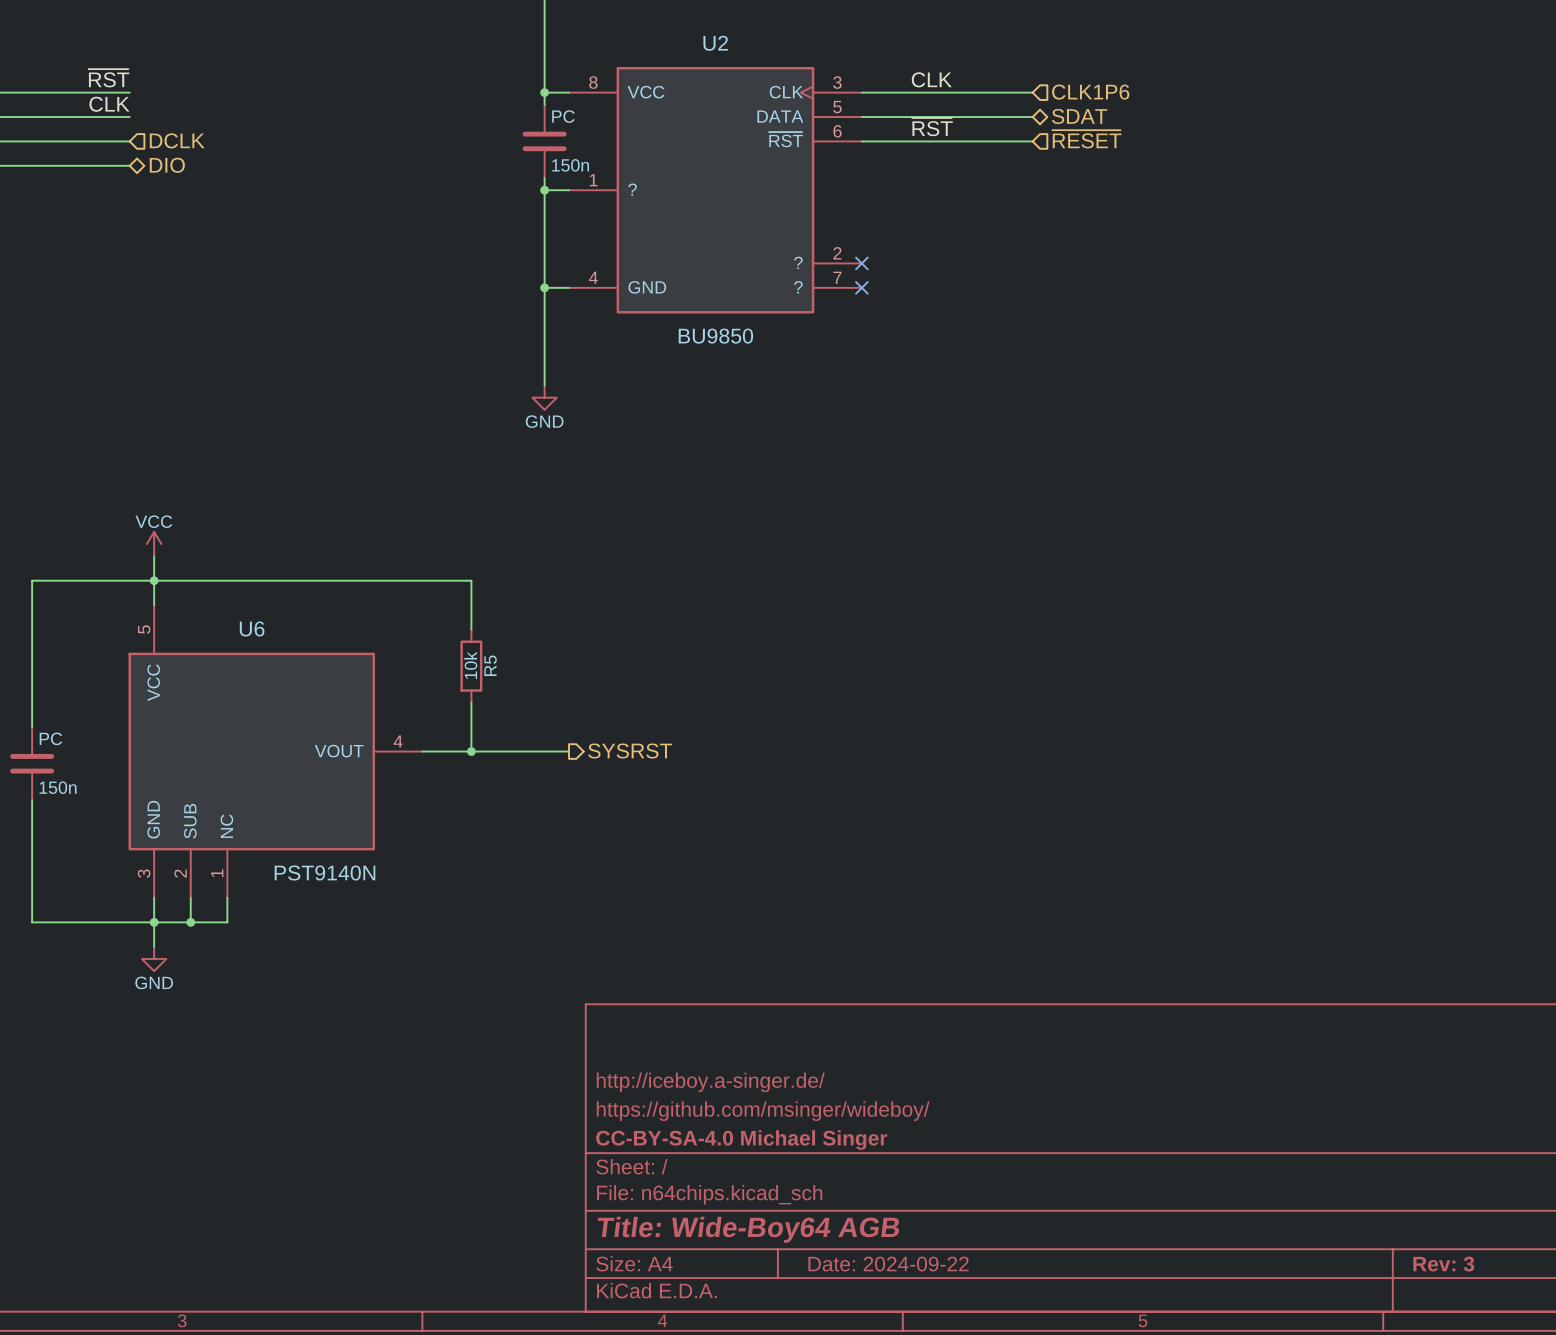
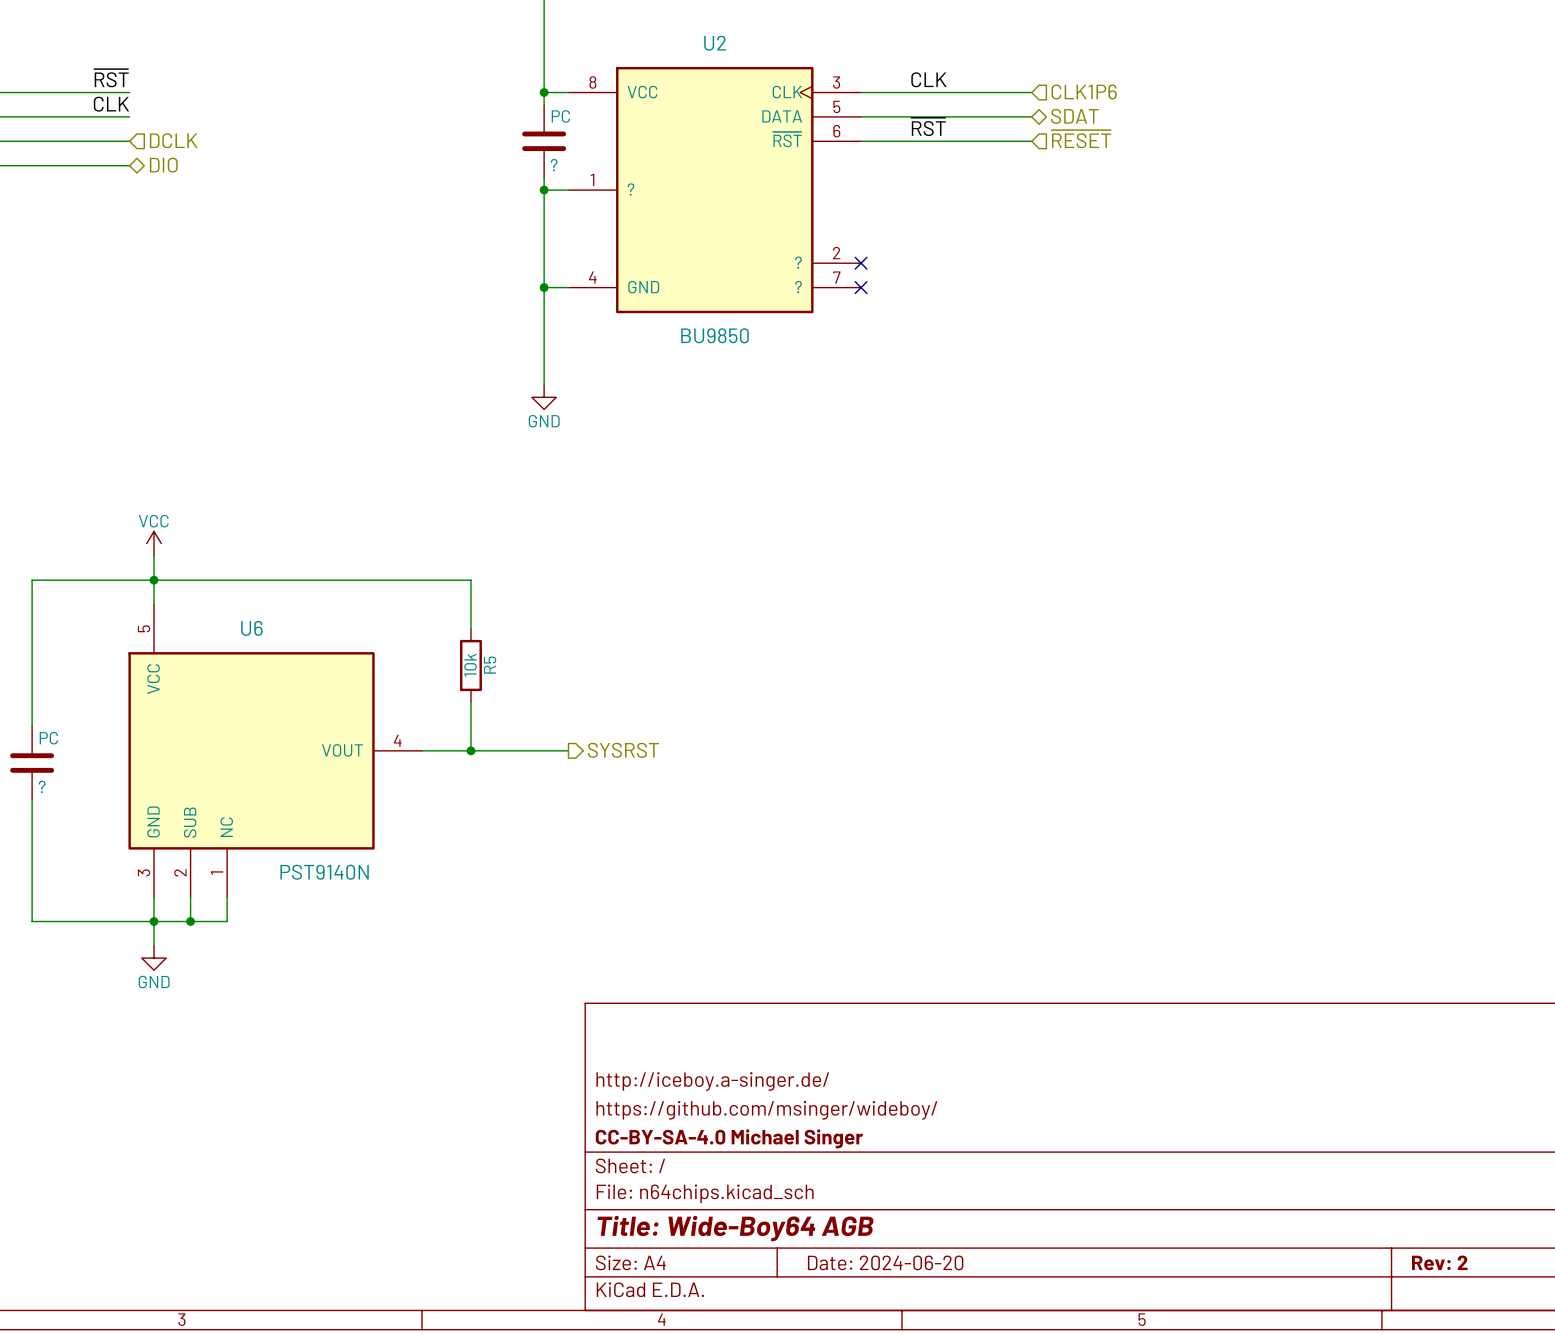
PC value: 150n (570, 165) -> ? (554, 165)
PC value: 150n (58, 787) -> ? (42, 786)
title block: Date: 2024-09-22 (888, 1264) -> Date: 2024-06-20 (885, 1262)
title block: Rev: 3 (1443, 1264) -> Rev: 2 (1439, 1262)

